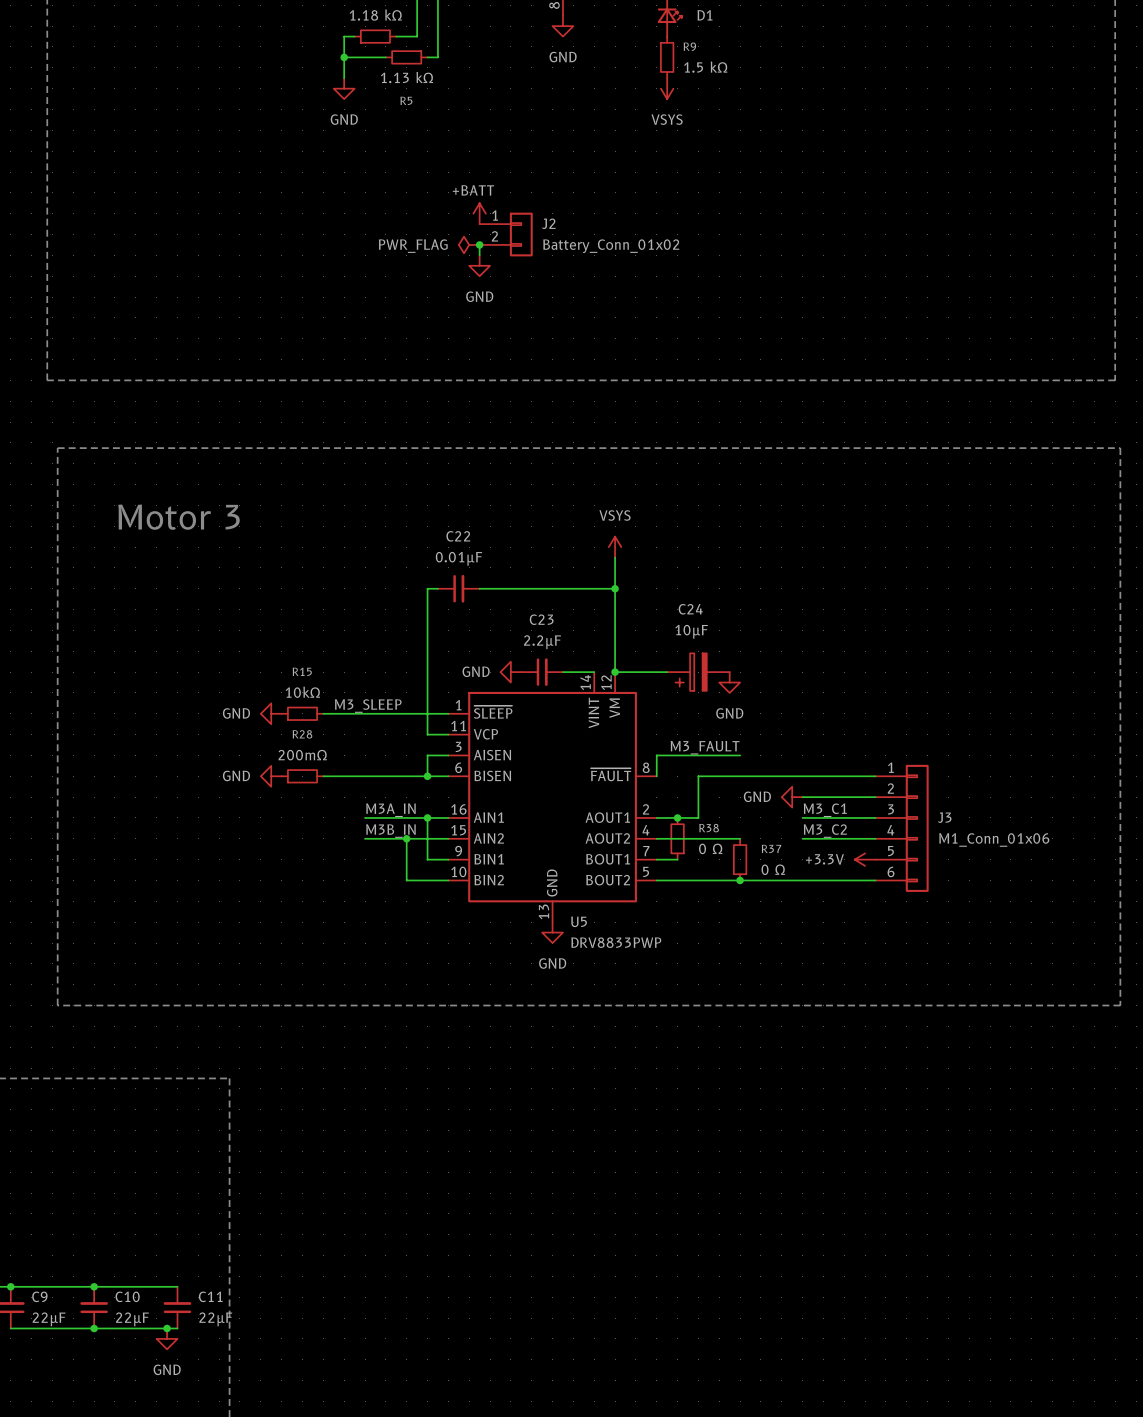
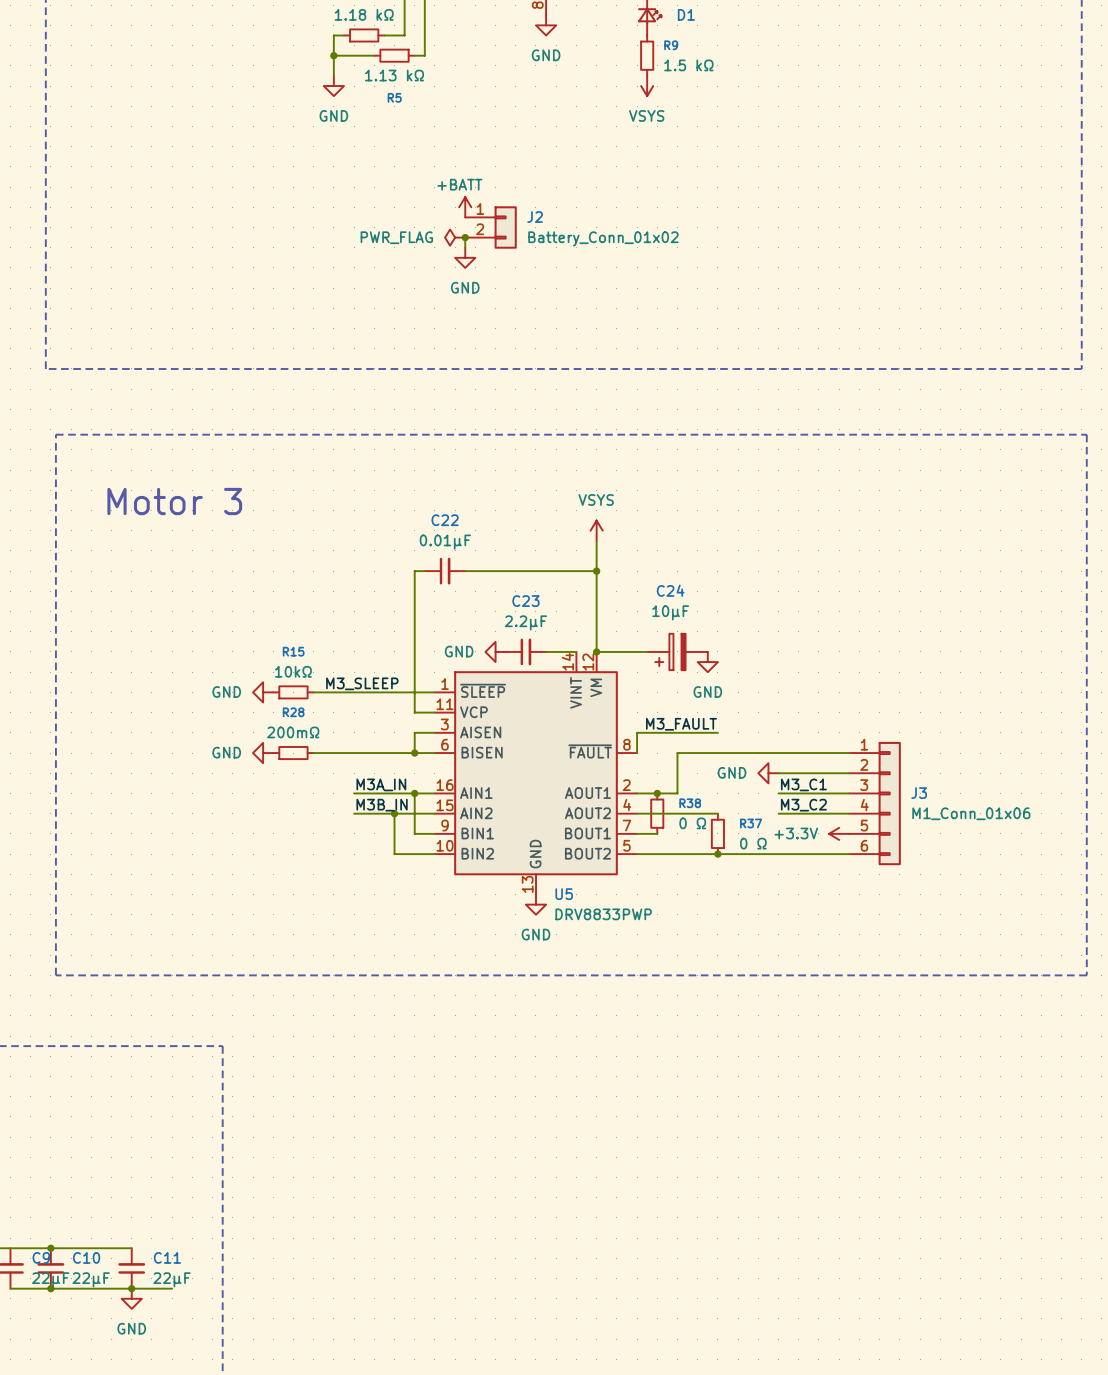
junction: (10, 1286) -> none
junction: none -> (50, 1248)
junction: (94, 1286) -> none
wire: (135, 1286) (177, 1286) -> none
C10 position: (94, 1307) -> (50, 1268)
C11 position: (177, 1307) -> (131, 1268)
junction: none -> (50, 1288)
junction: (94, 1328) -> none
junction: none -> (131, 1288)
junction: (167, 1328) -> none
power symbol position: GND (167, 1338) -> GND (131, 1298)

